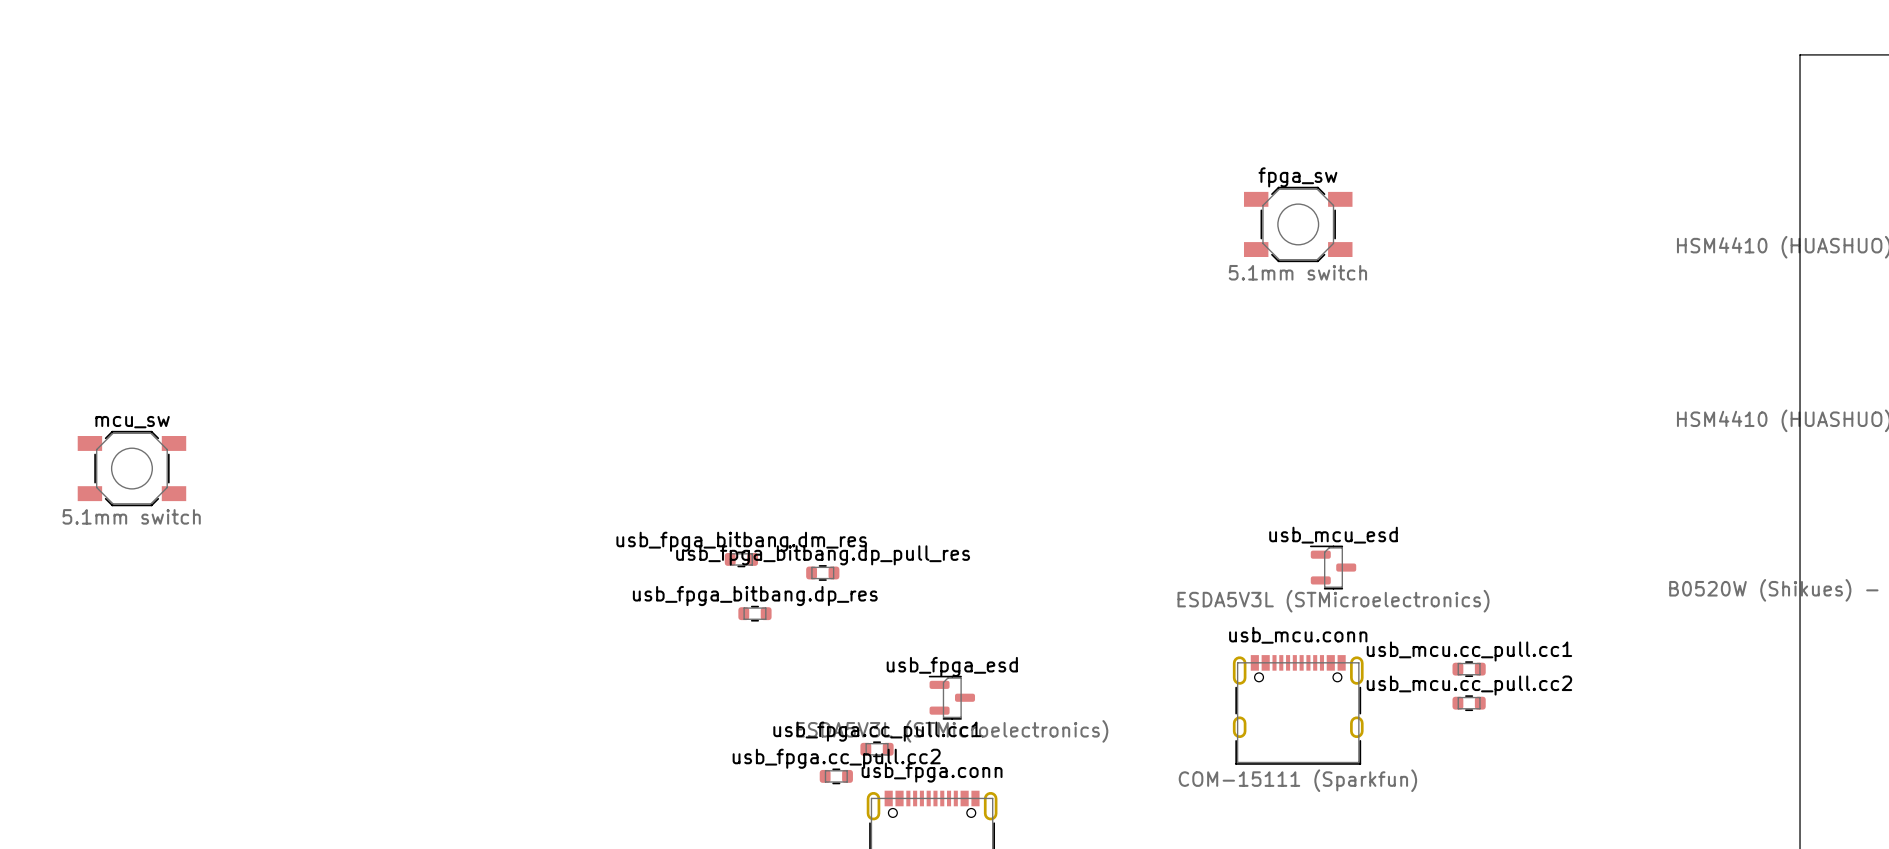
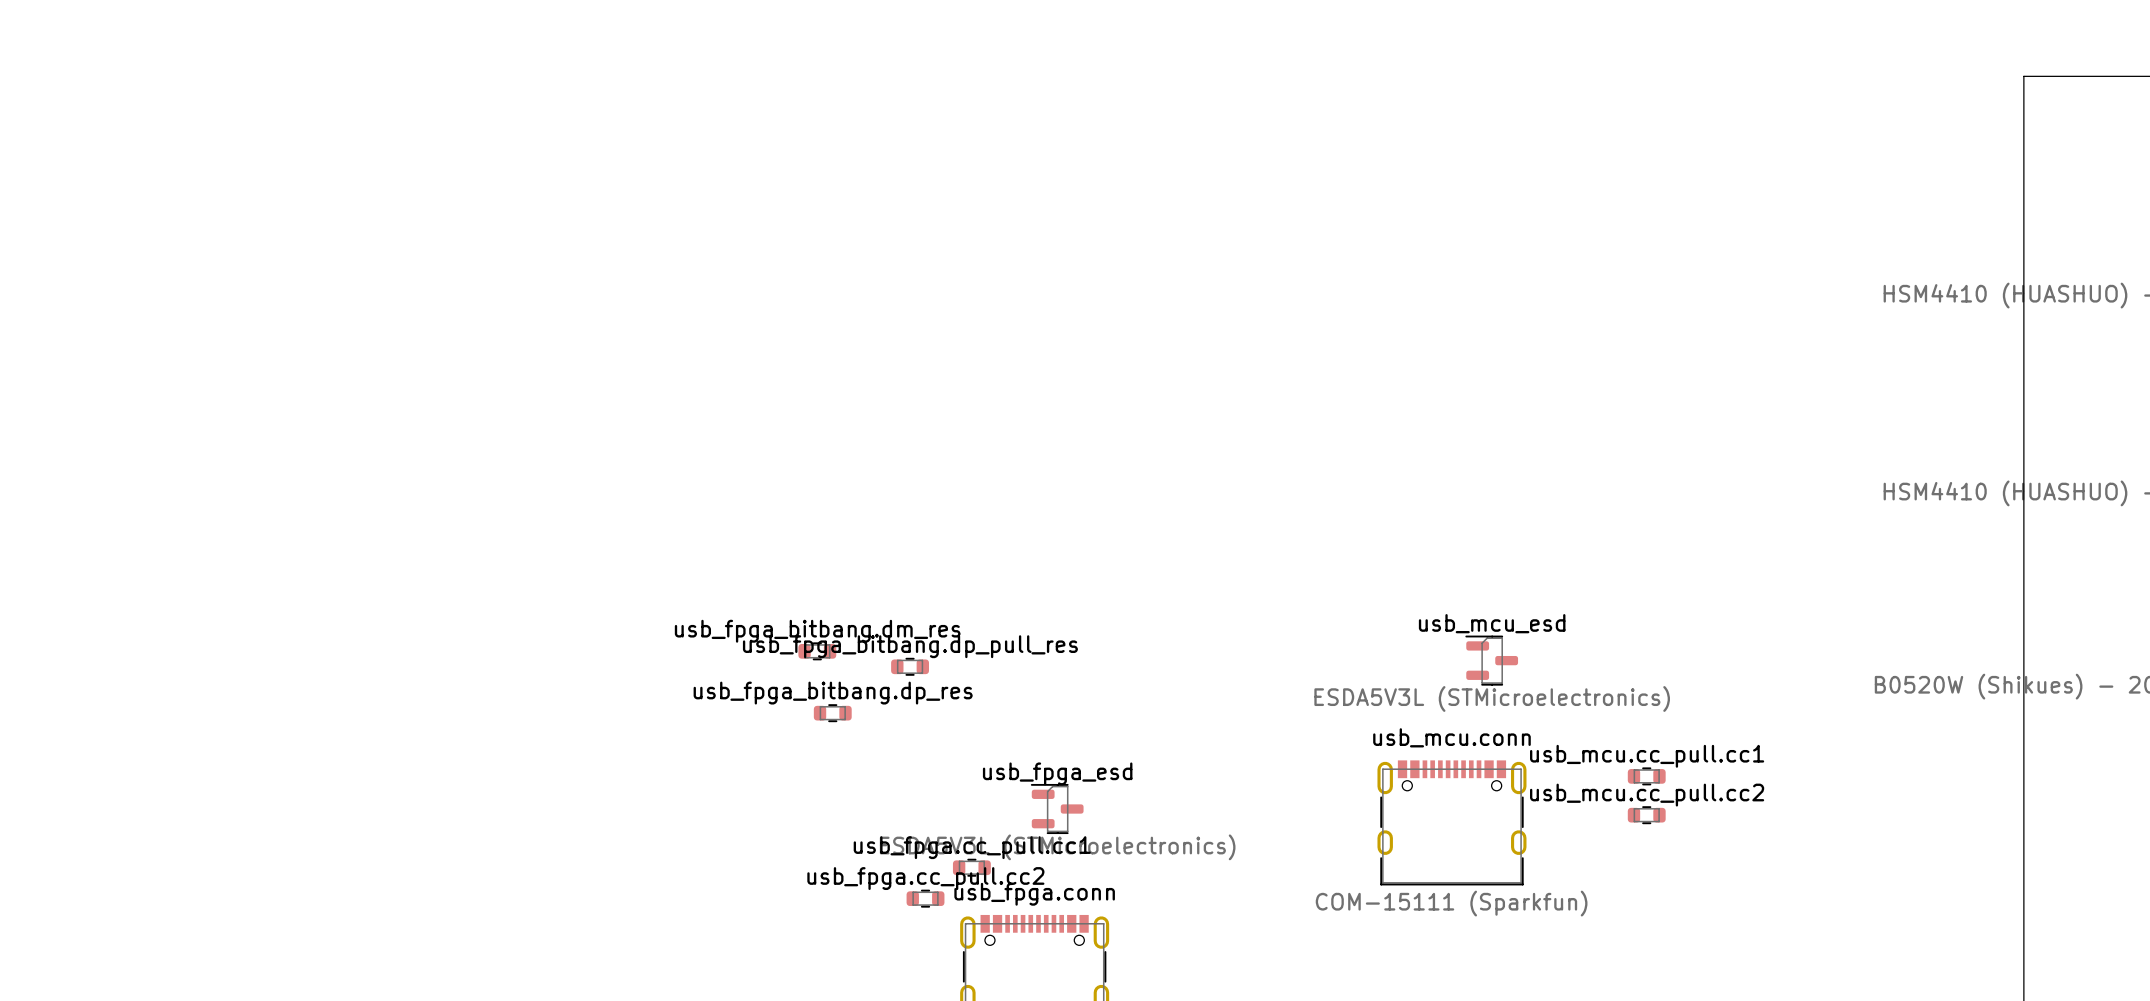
fpga_sw: 5.1mm switch (1298, 224) -> none
mcu_sw: 5.1mm switch (131, 468) -> none

